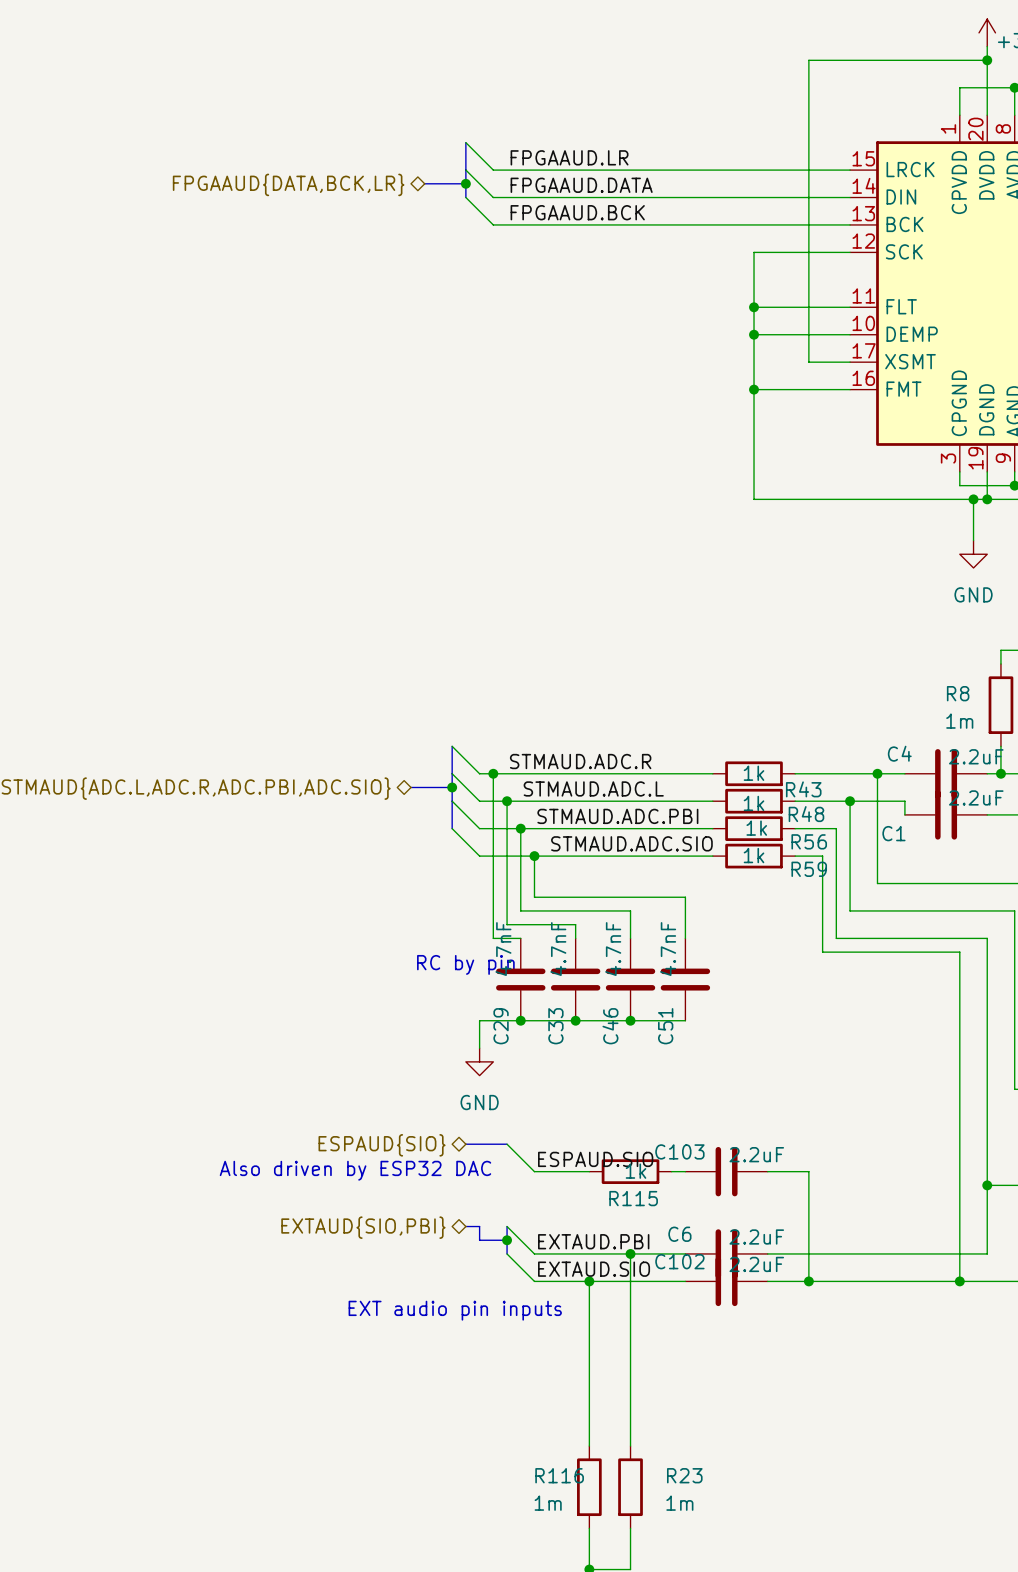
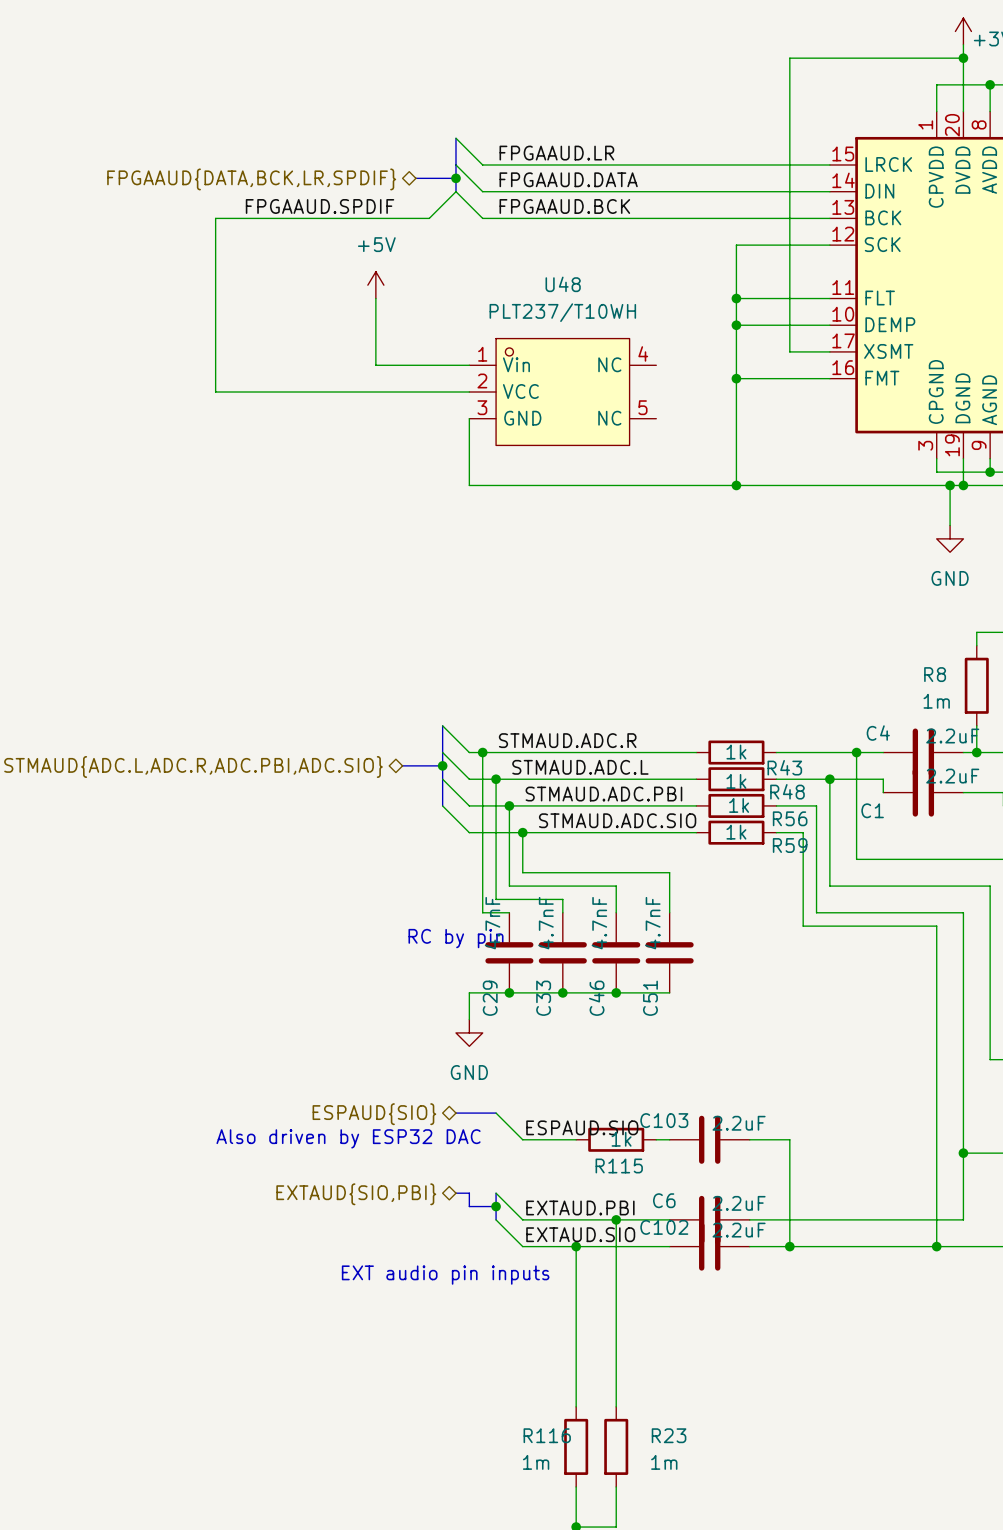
hierarchical label: FPGAAUD{DATA,BCK,LR} (288, 184) -> FPGAAUD{DATA,BCK,LR,SPDIF} (251, 179)
wire: none -> (455, 191) (429, 218) (215, 218) (215, 392) (469, 392)
label: none -> FPGAAUD.SPDIF (320, 206)
power symbol: none -> +5V (375, 285)
wire: none -> (375, 298) (375, 365) (469, 365)
U48: none -> PLT237/T10WH (562, 392)
wire: none -> (469, 418) (469, 485) (736, 485)
junction: none -> (736, 485)

